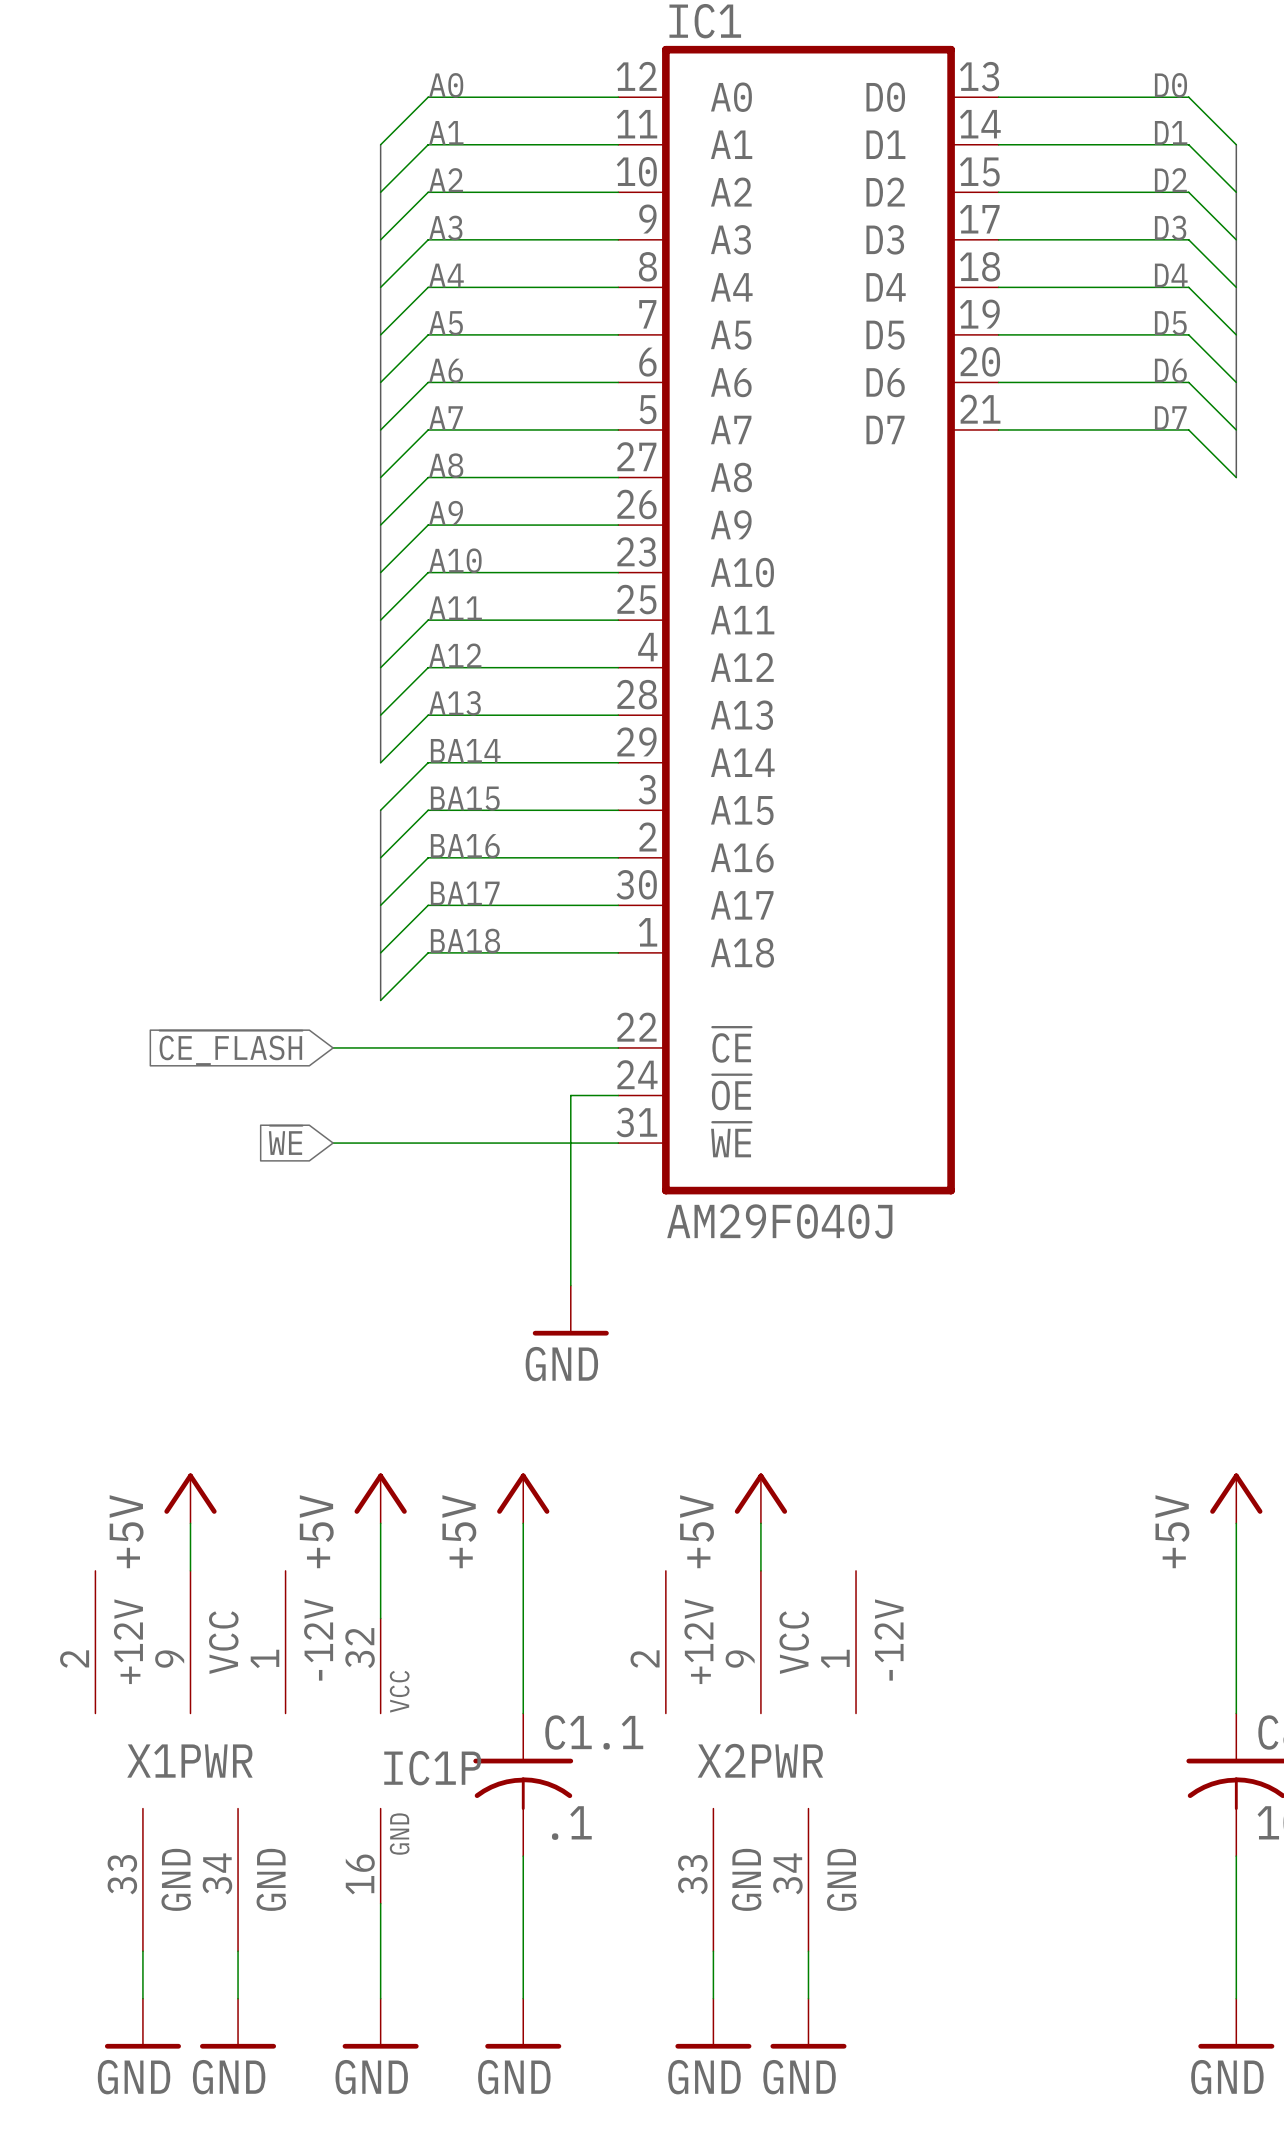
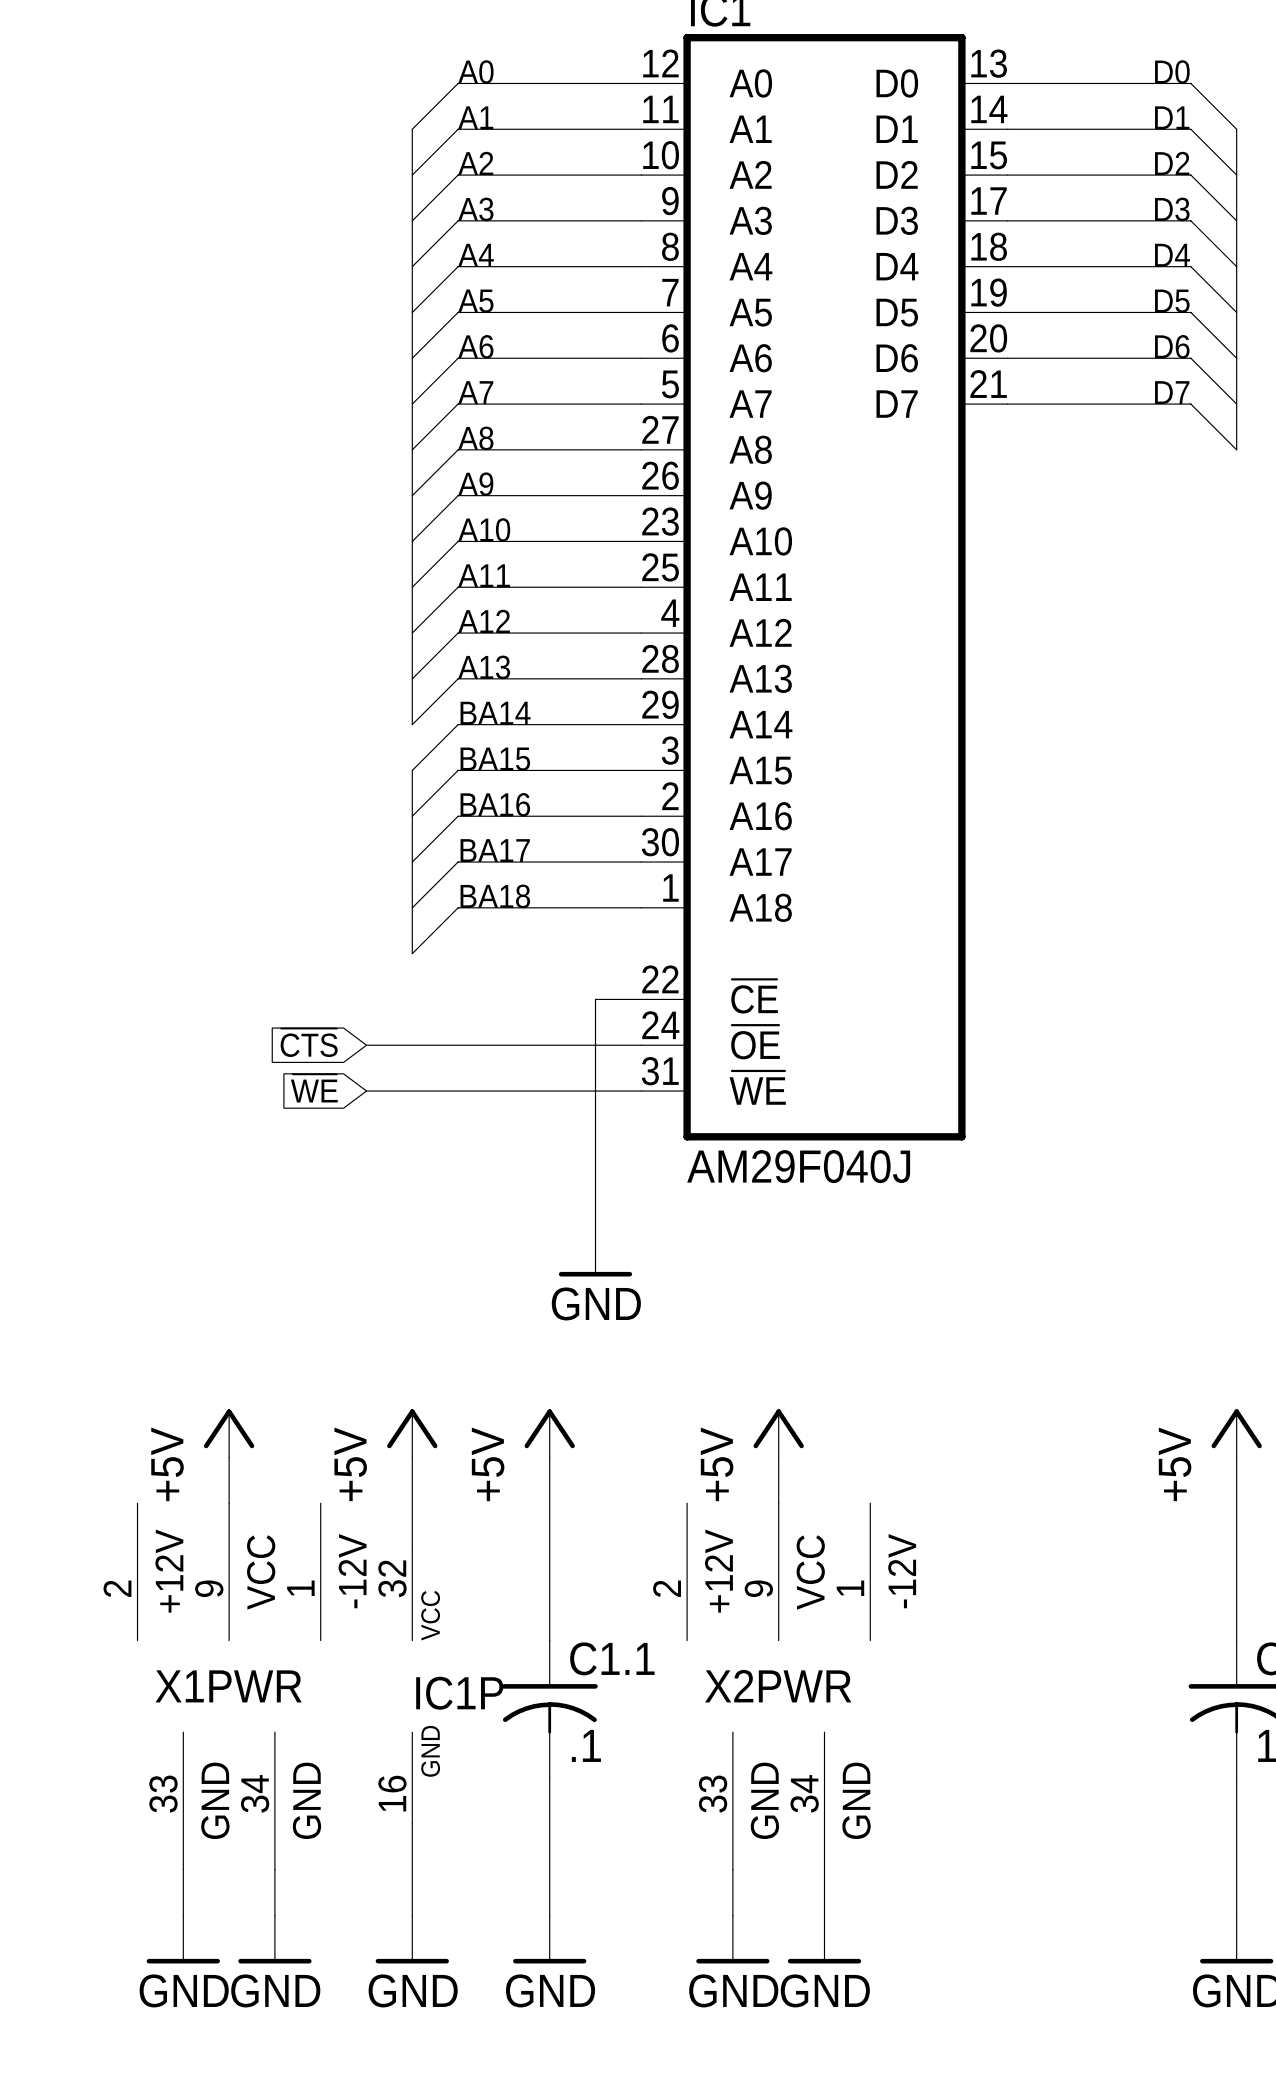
wire: (333, 1047) (570, 1047) -> (366, 1045) (595, 1045) (595, 999)
global label: ~{CE_FLASH} (231, 1048) -> none
global label: none -> ~{CTS} (309, 1042)

